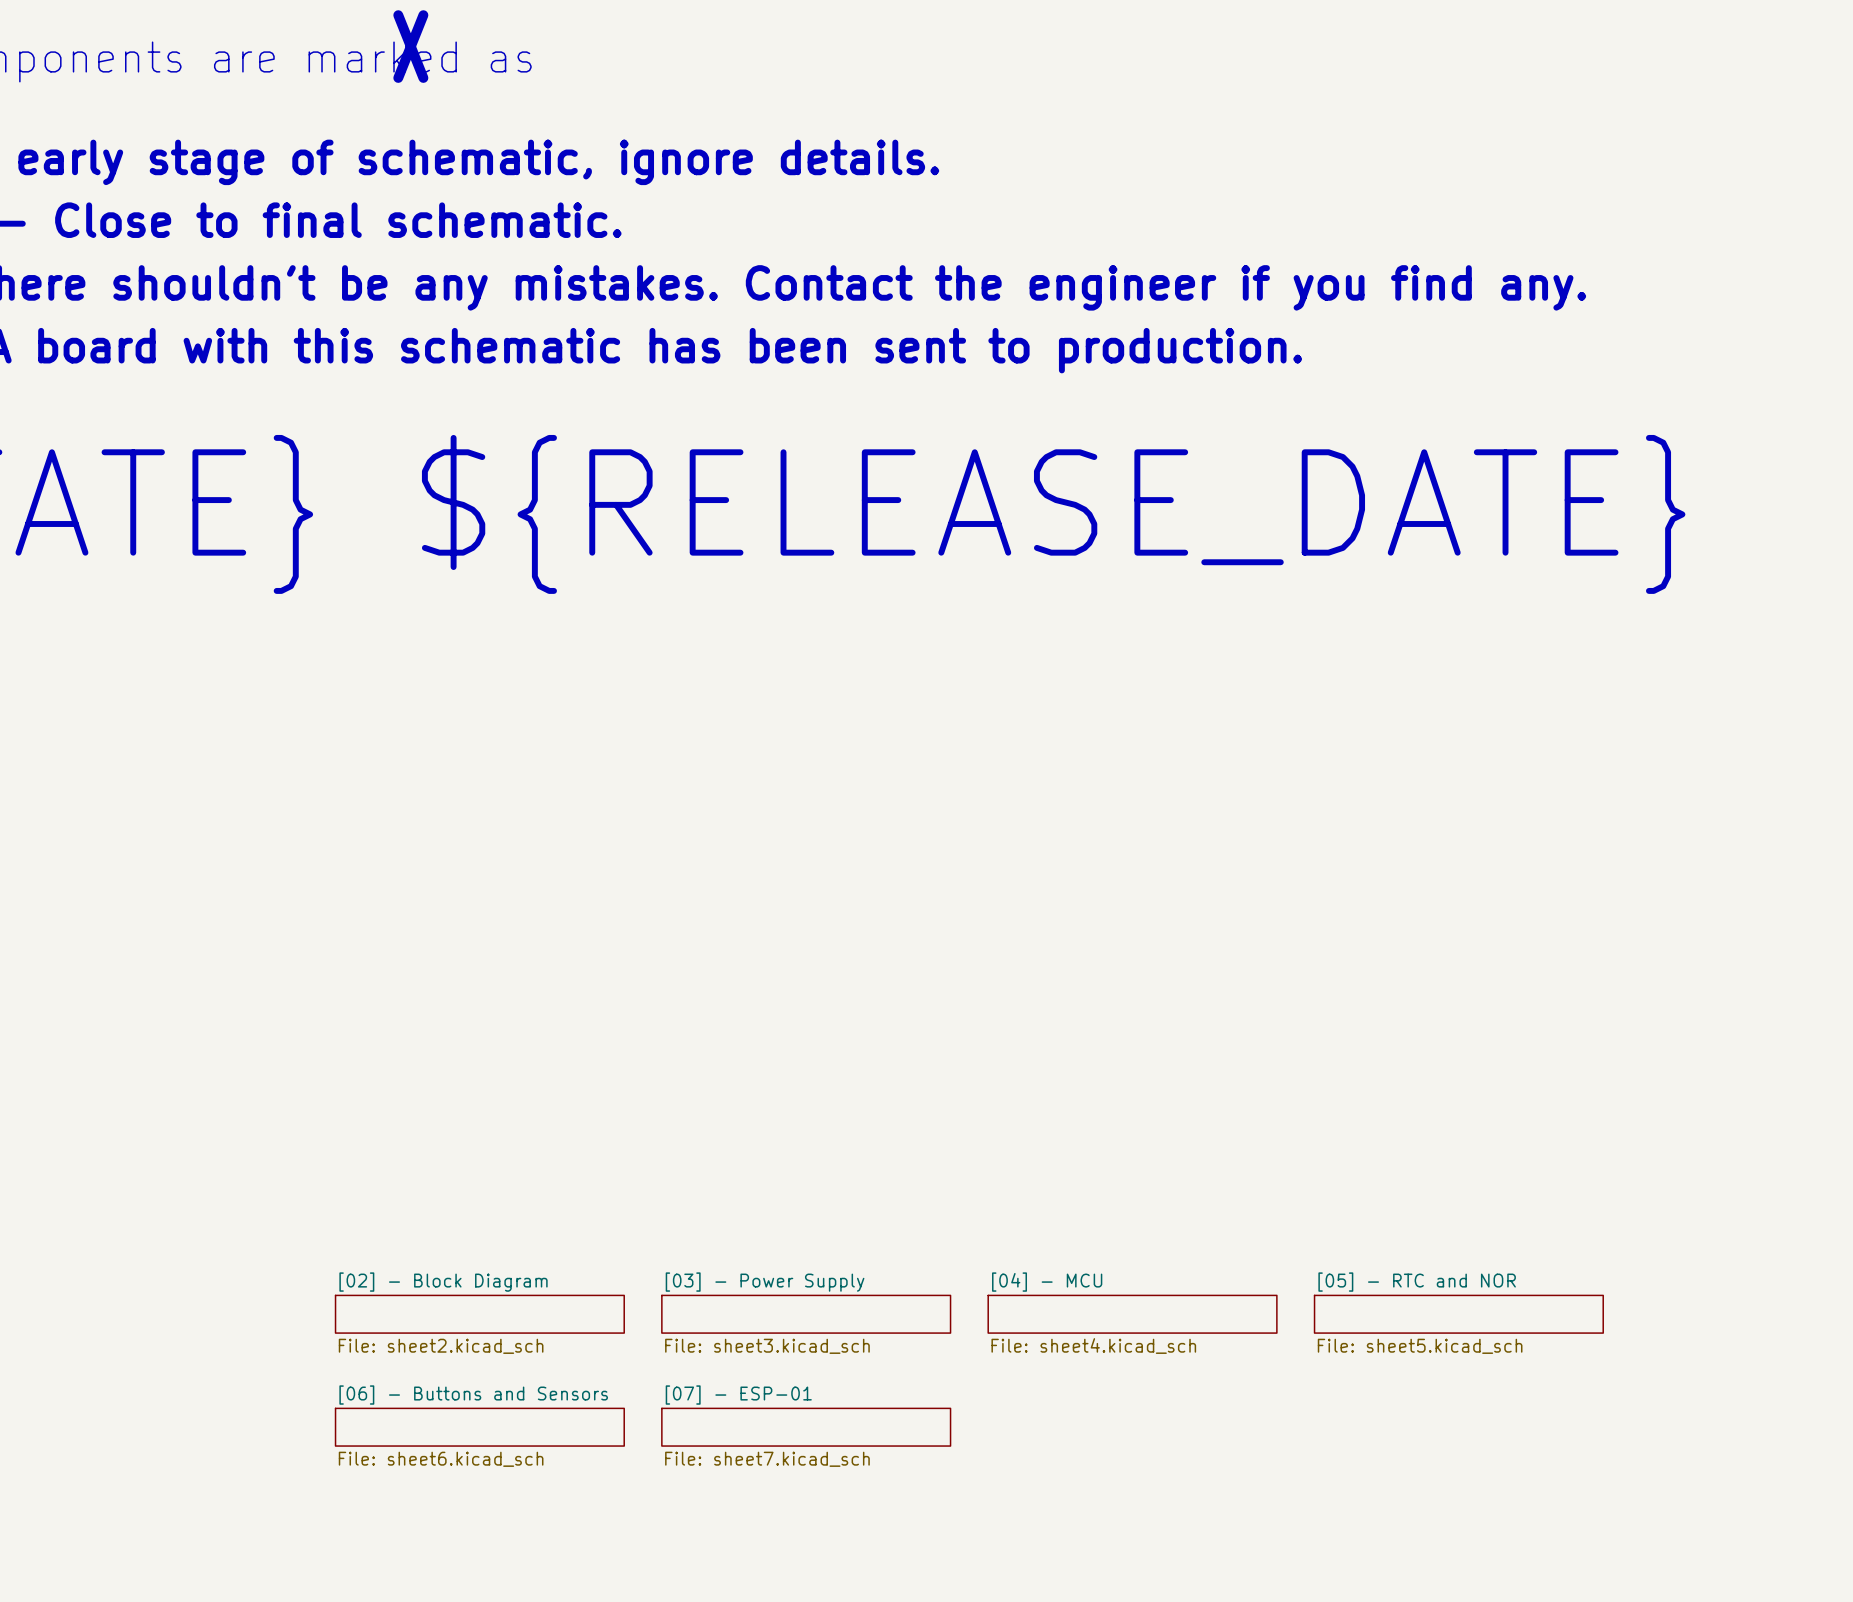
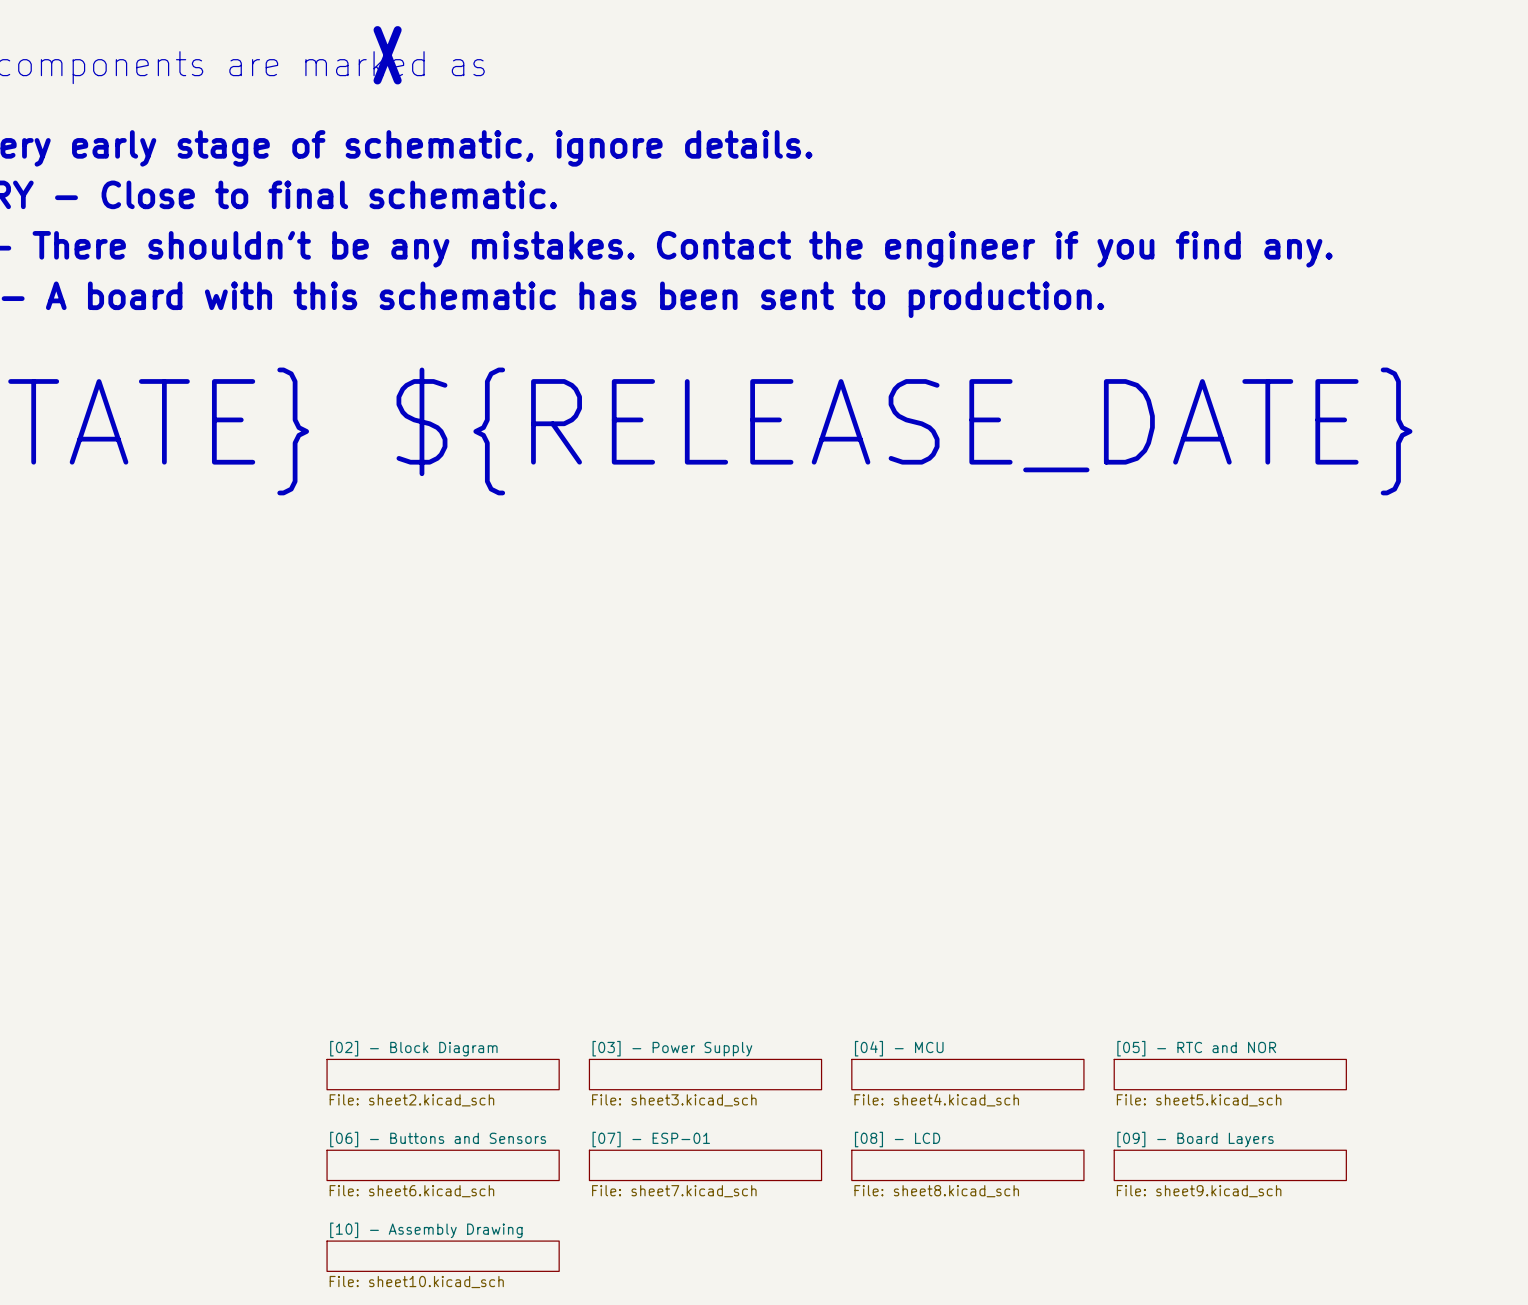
sheet [08] - LCD: none -> File: sheet8.kicad_sch (967, 1165)
sheet [09] - Board Layers: none -> File: sheet9.kicad_sch (1230, 1165)
sheet [10] - Assembly Drawing: none -> File: sheet10.kicad_sch (443, 1256)

